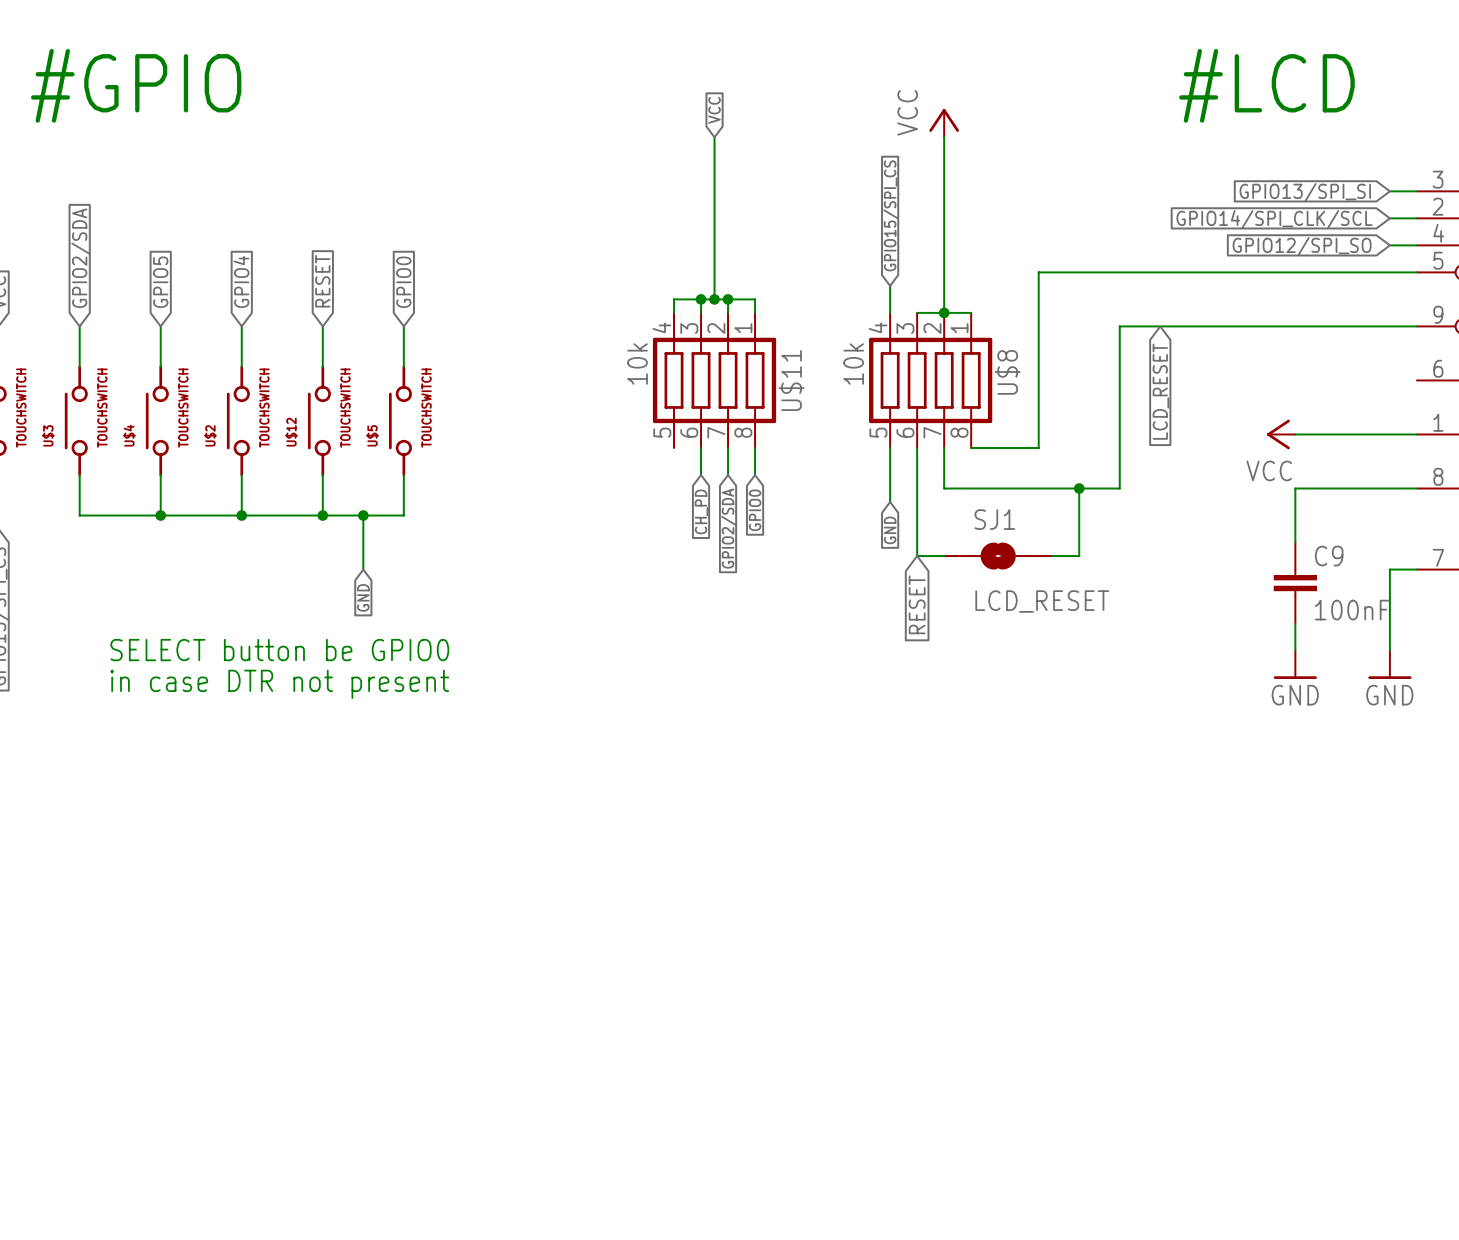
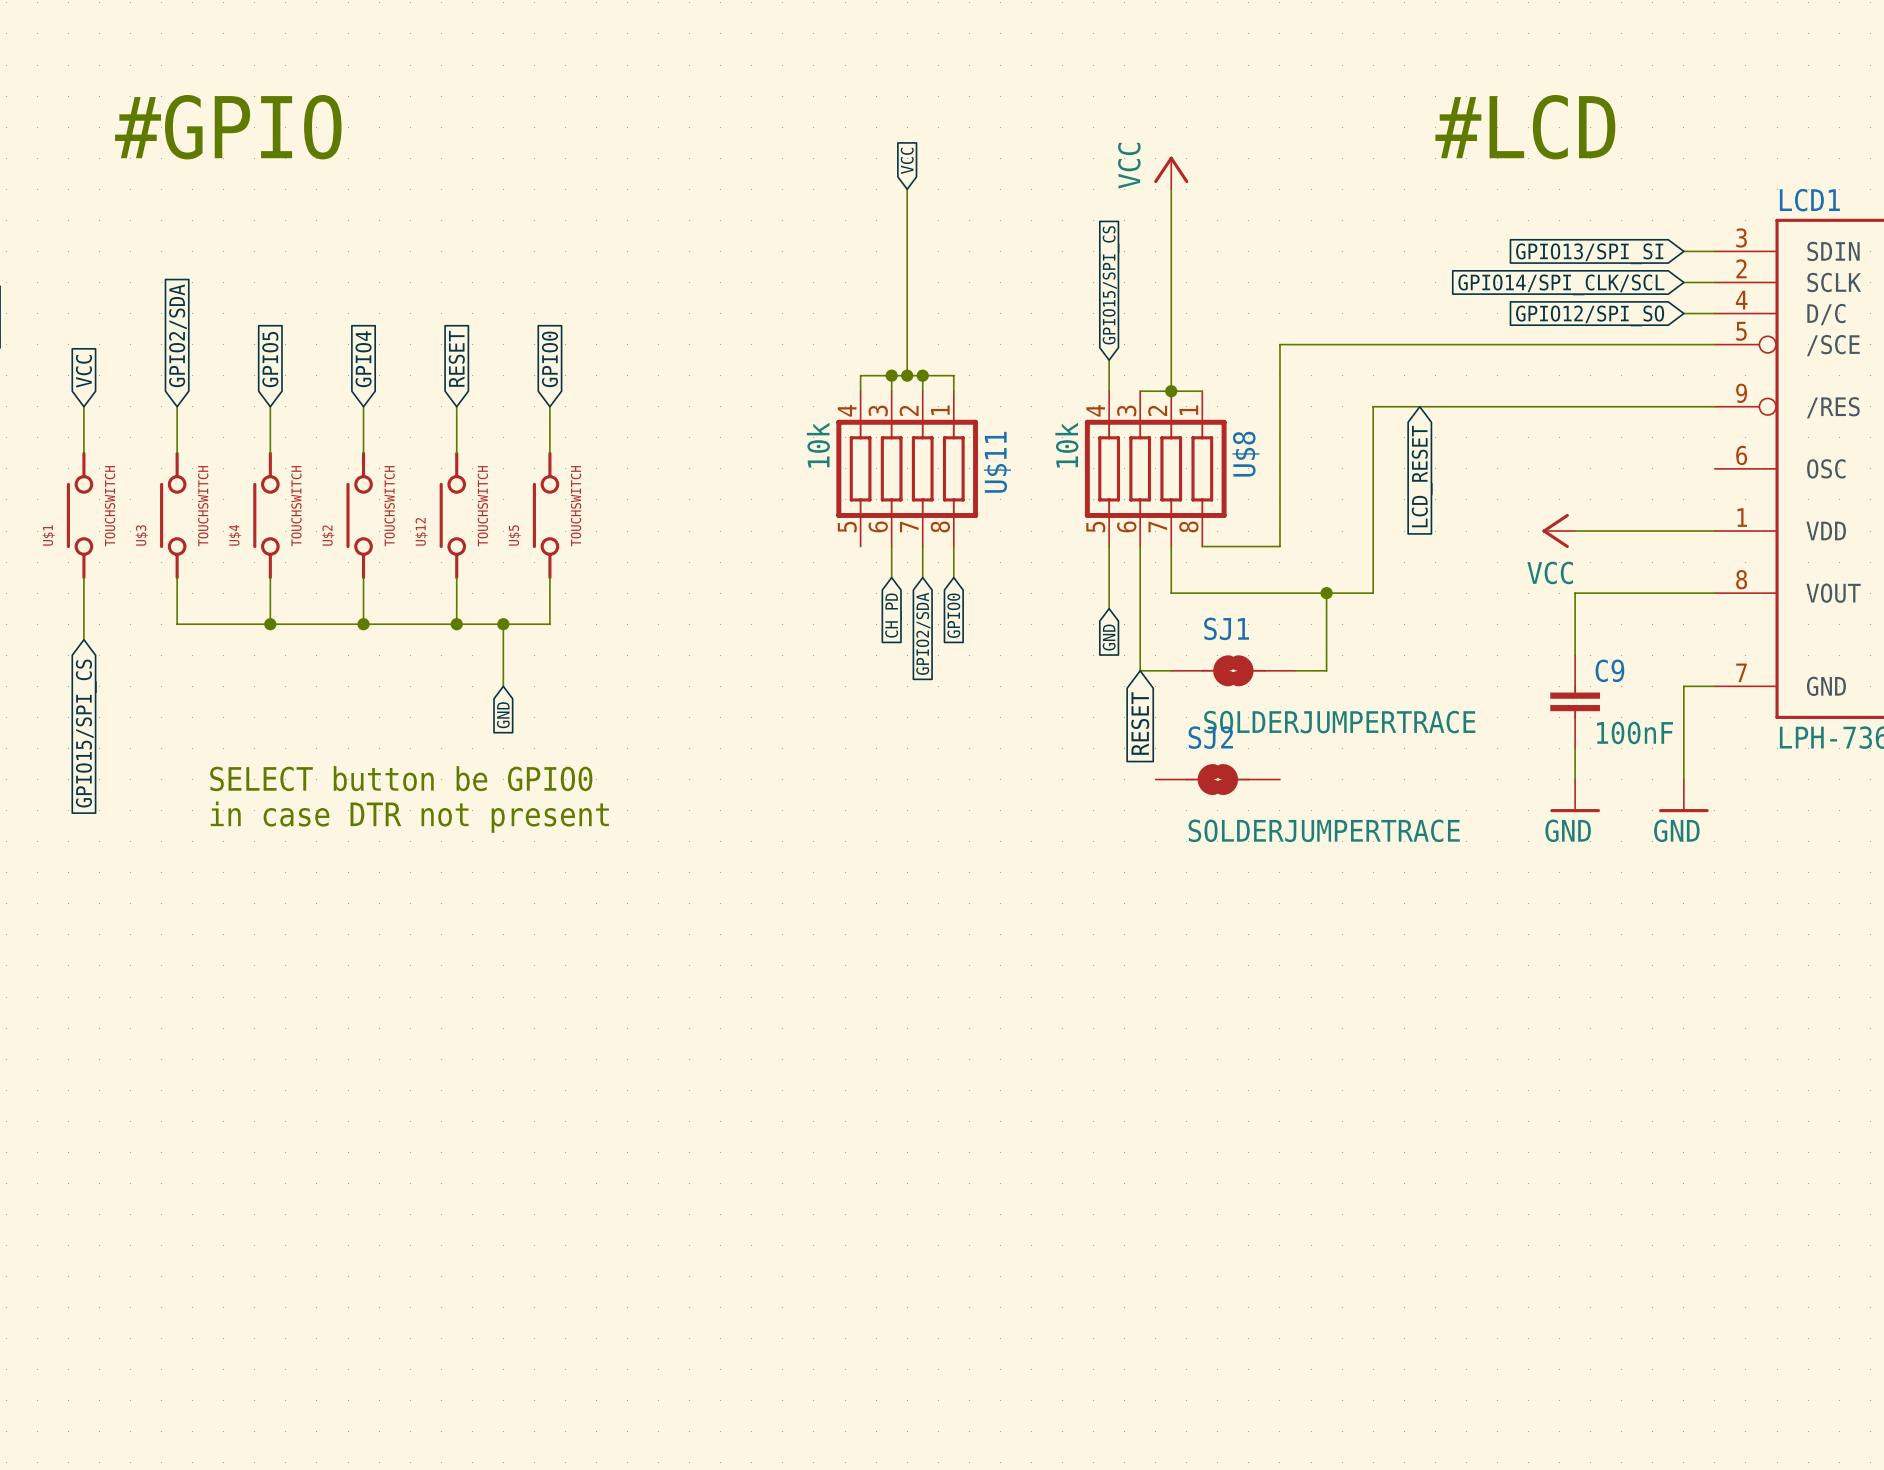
SJ1 value: LCD_RESET (1042, 601) -> SOLDERJUMPERTRACE (1339, 722)
SJ2: none -> SOLDERJUMPERTRACE (1217, 779)

